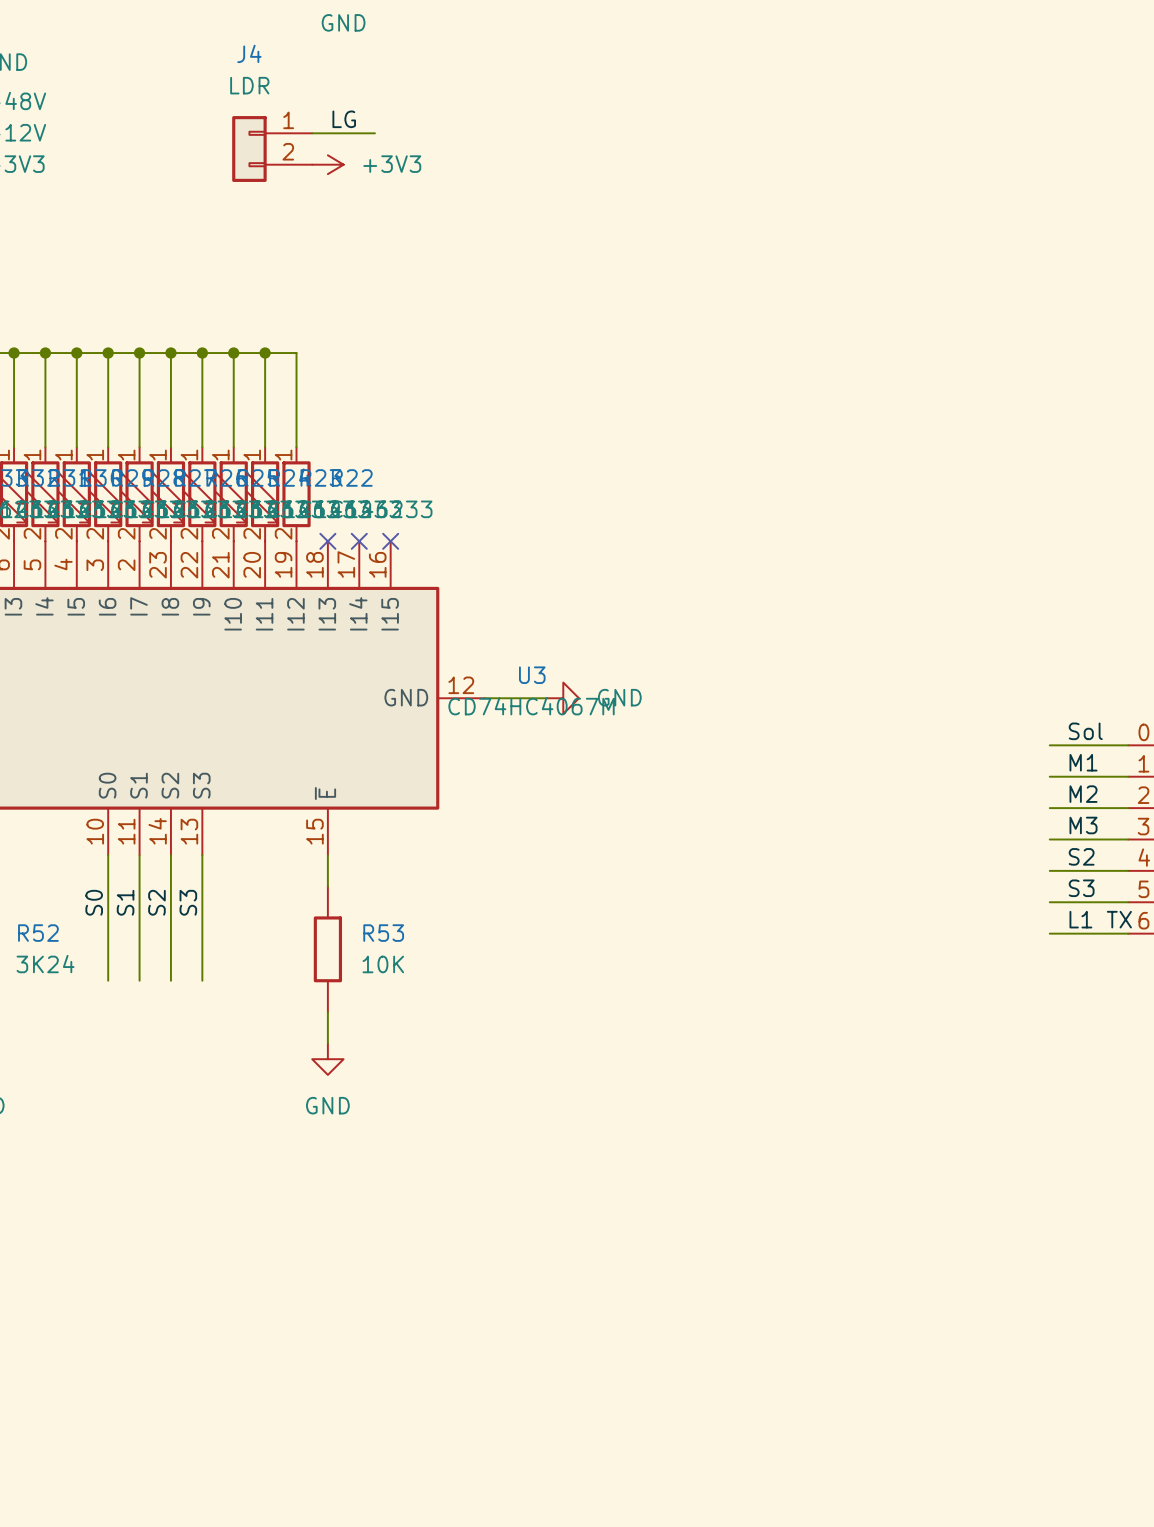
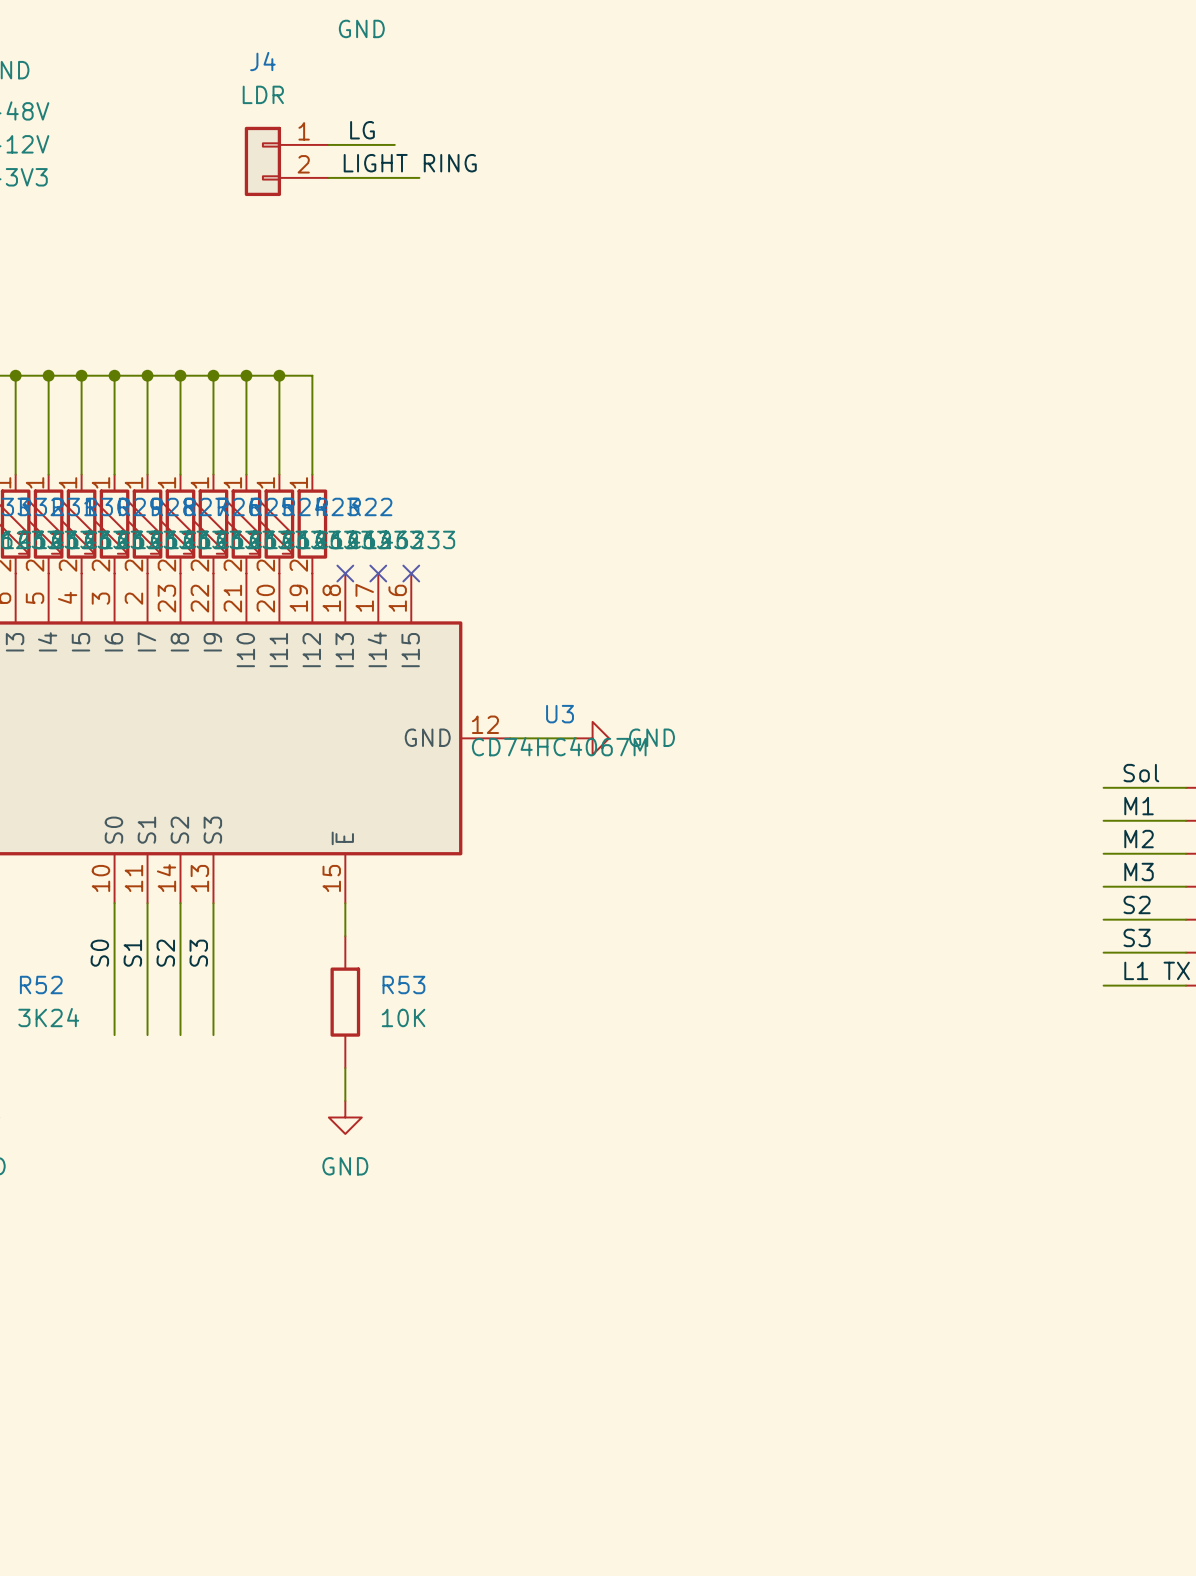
label: none -> LIGHT RING (410, 163)
wire: none -> (328, 177) (419, 177)
power symbol: +3V3 (327, 164) -> none

